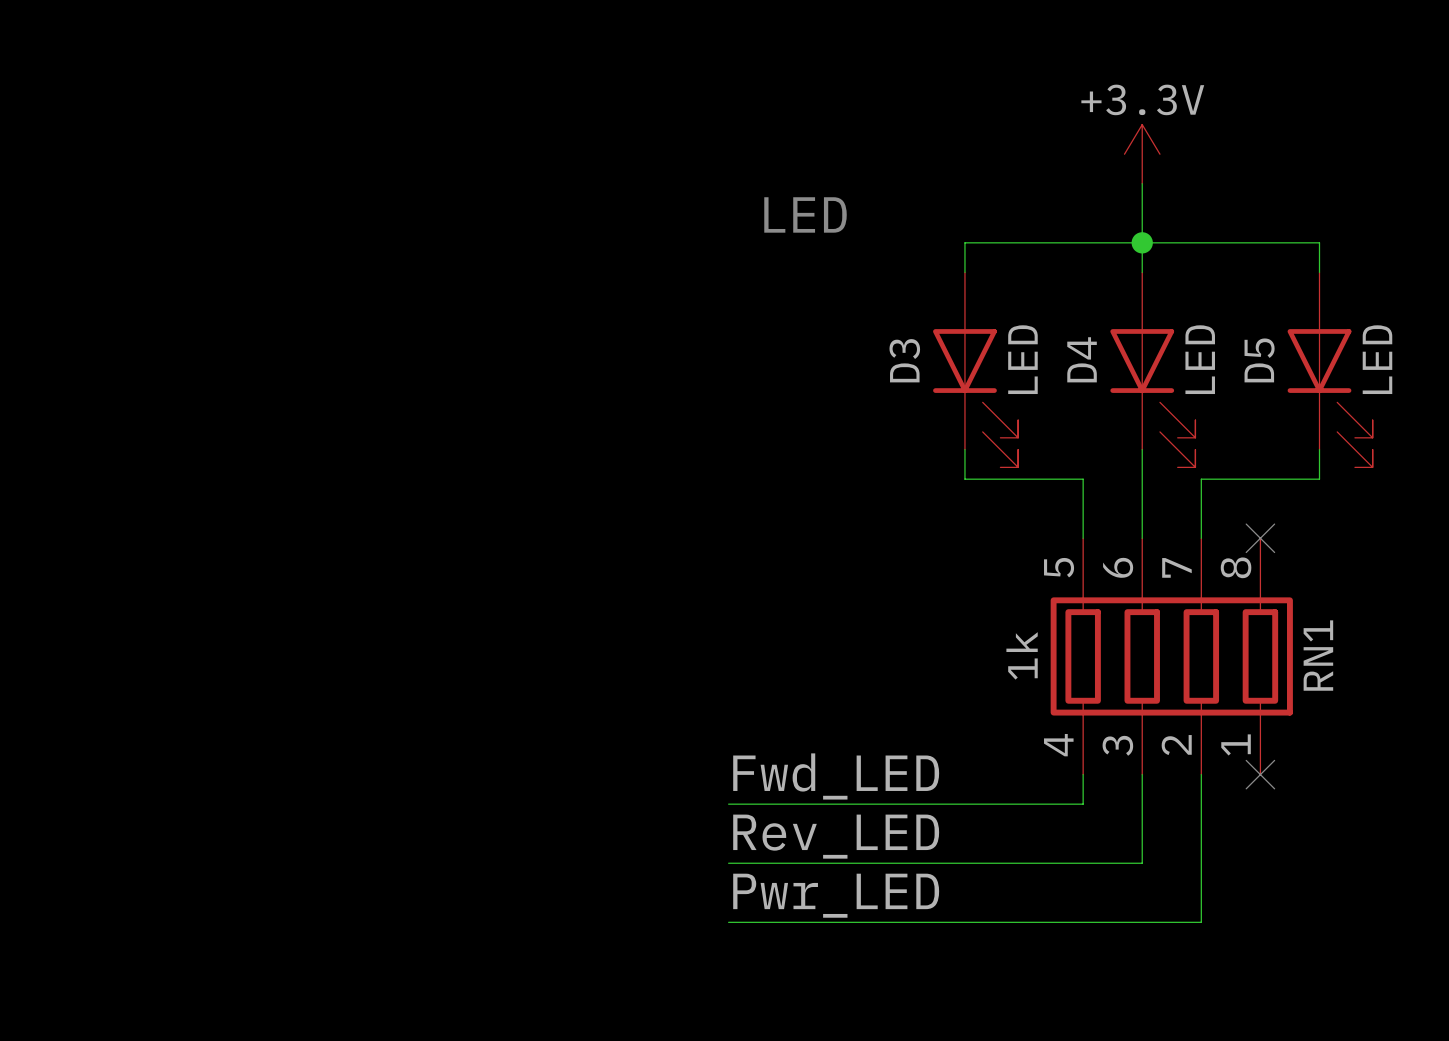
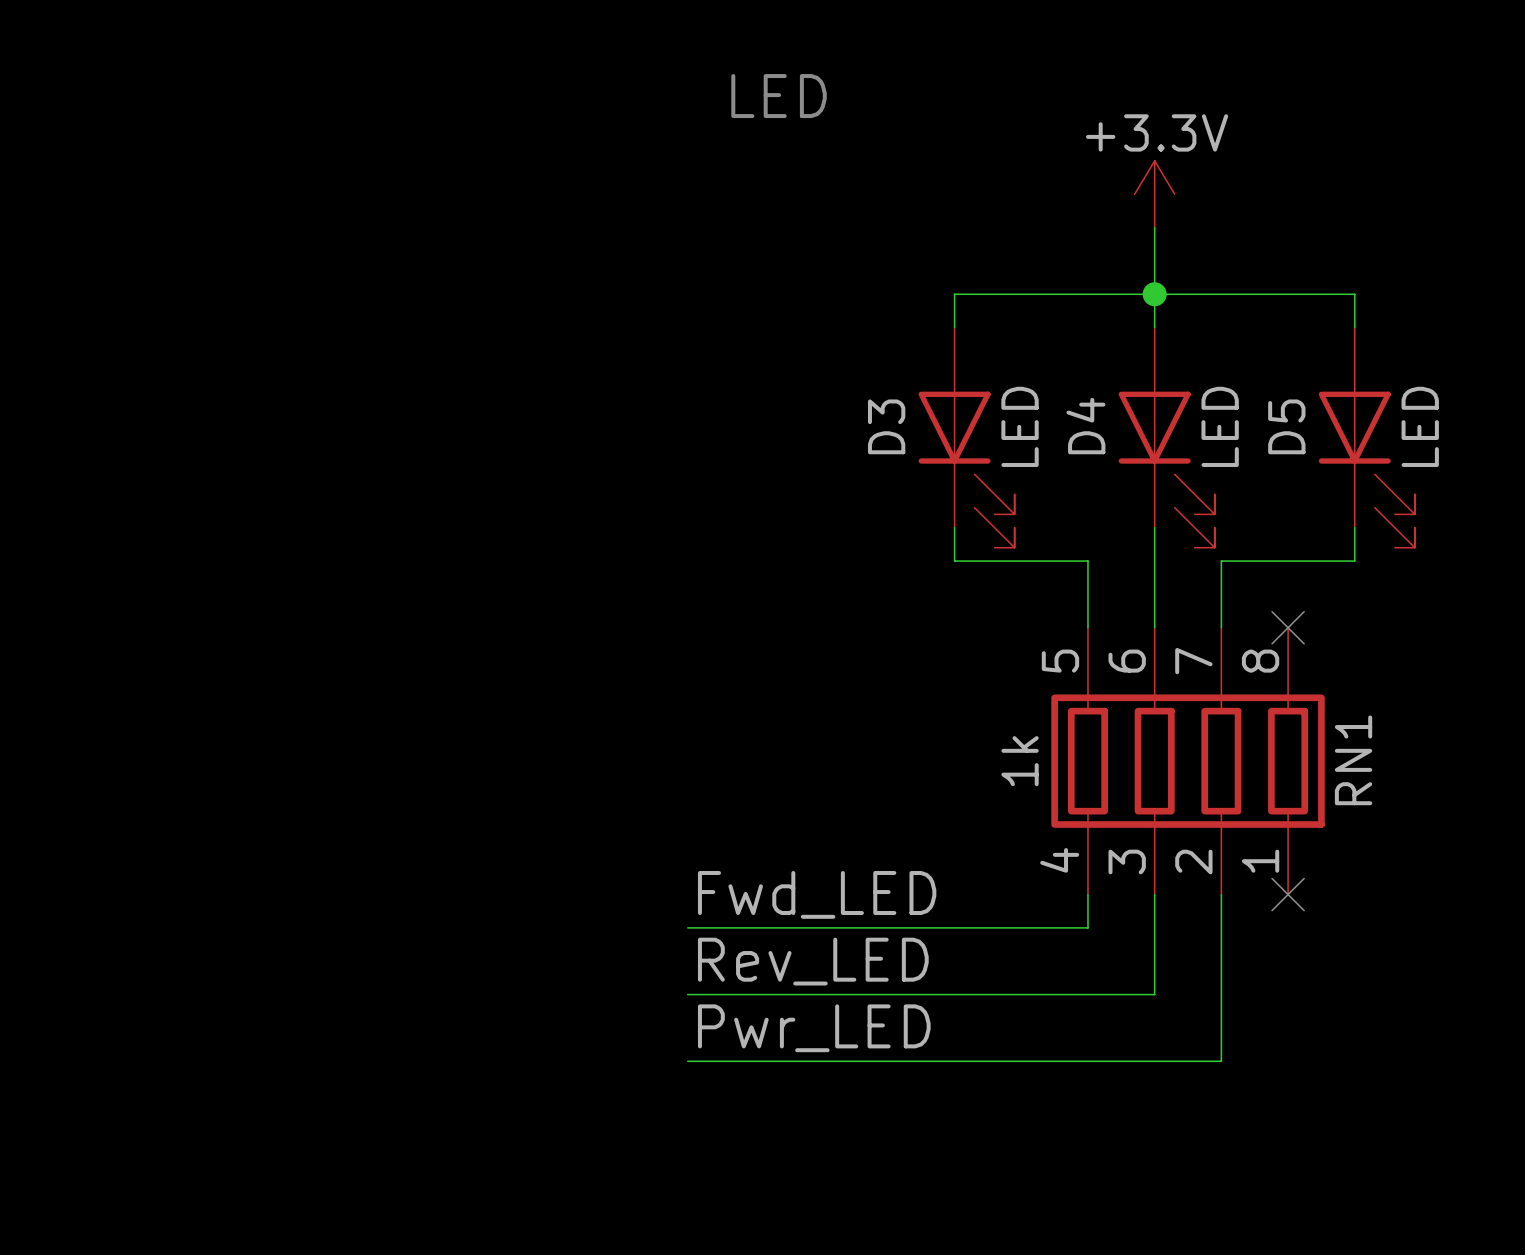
text position: LED (805, 214) -> LED (779, 96)

